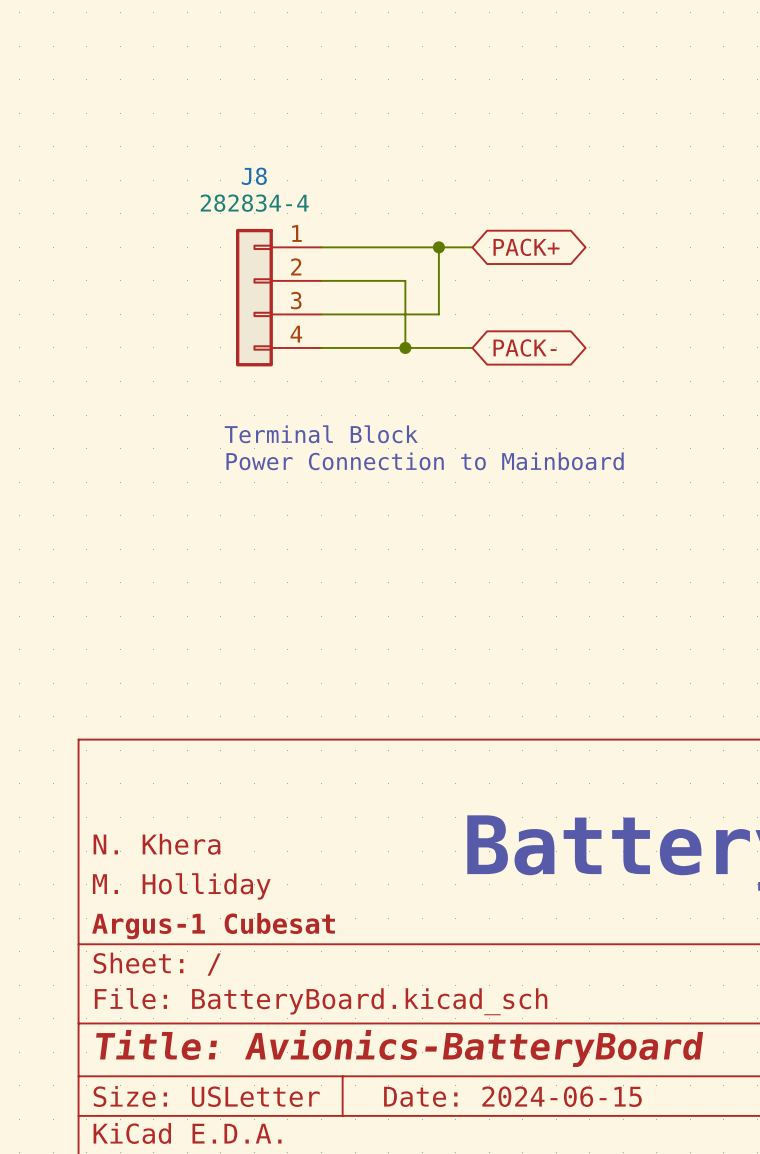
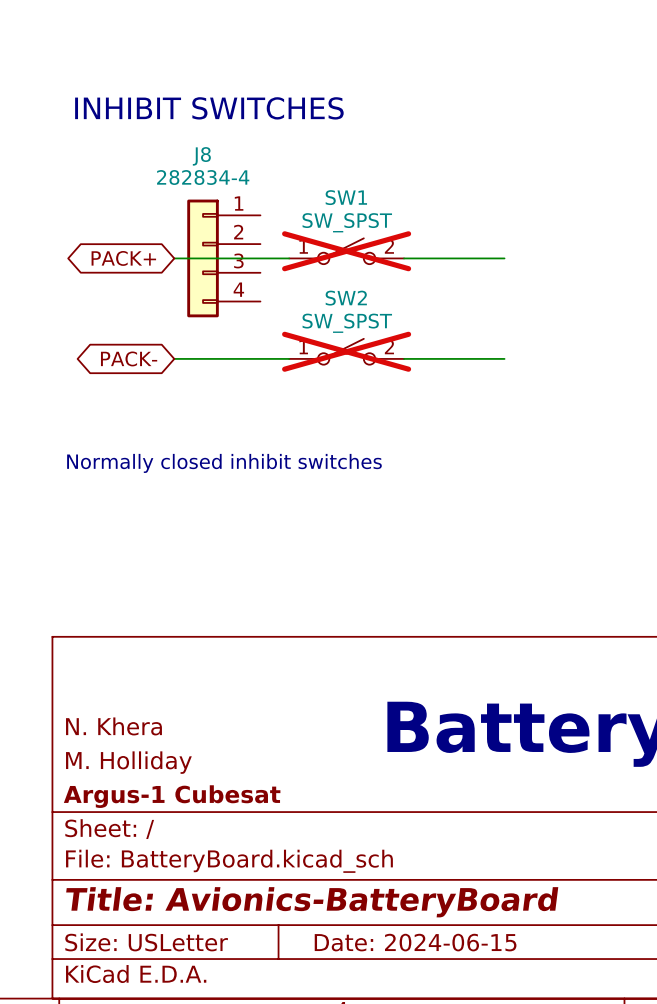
text: none -> INHIBIT SWITCHES (209, 108)
wire: (321, 247) (472, 247) -> none
wire: (438, 247) (438, 314) (321, 314) -> none
junction: (438, 247) -> none
global label rotation: 0° (526, 247) -> 180° (123, 258)
global label position: PACK+ (526, 247) -> PACK+ (123, 258)
wire: (321, 280) (405, 280) (405, 347) -> none
SW1: none -> SW_SPST (346, 251)
wire: none -> (174, 258) (289, 258)
wire: none -> (404, 258) (504, 258)
wire: (321, 347) (472, 347) -> none
junction: (405, 347) -> none
global label rotation: 0° (525, 347) -> 180° (129, 358)
global label position: PACK- (525, 347) -> PACK- (129, 358)
SW2: none -> SW_SPST (346, 351)
wire: none -> (174, 358) (289, 358)
wire: none -> (404, 358) (504, 358)
text: Terminal Block (321, 434) -> none
text: Power Connection to Mainboard (425, 461) -> none
text: none -> Normally closed inhibit switches (224, 463)

